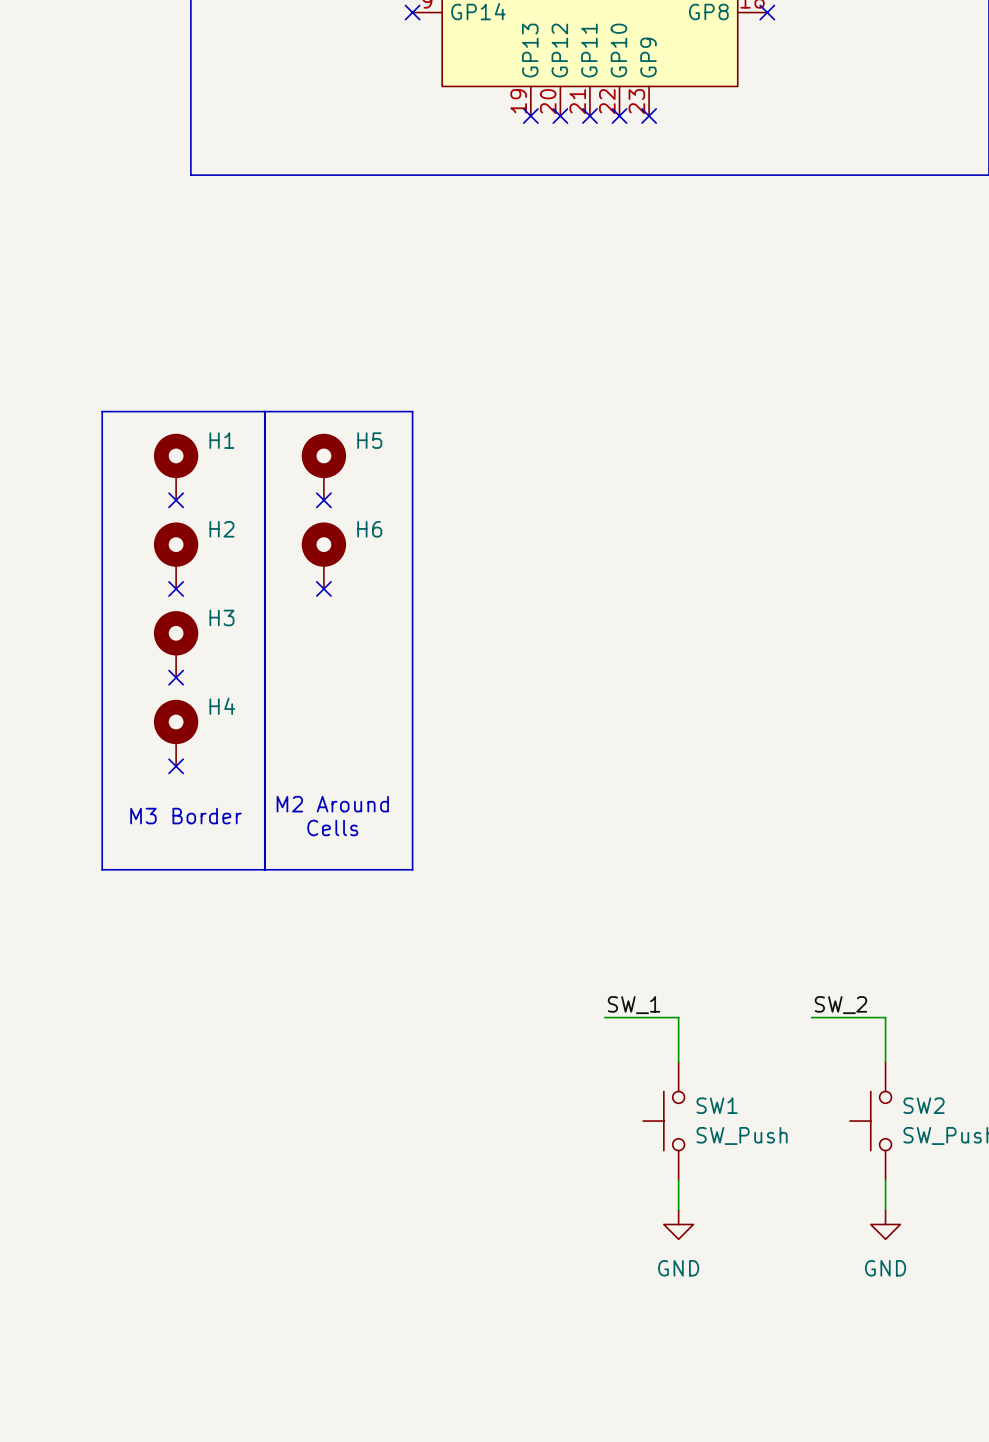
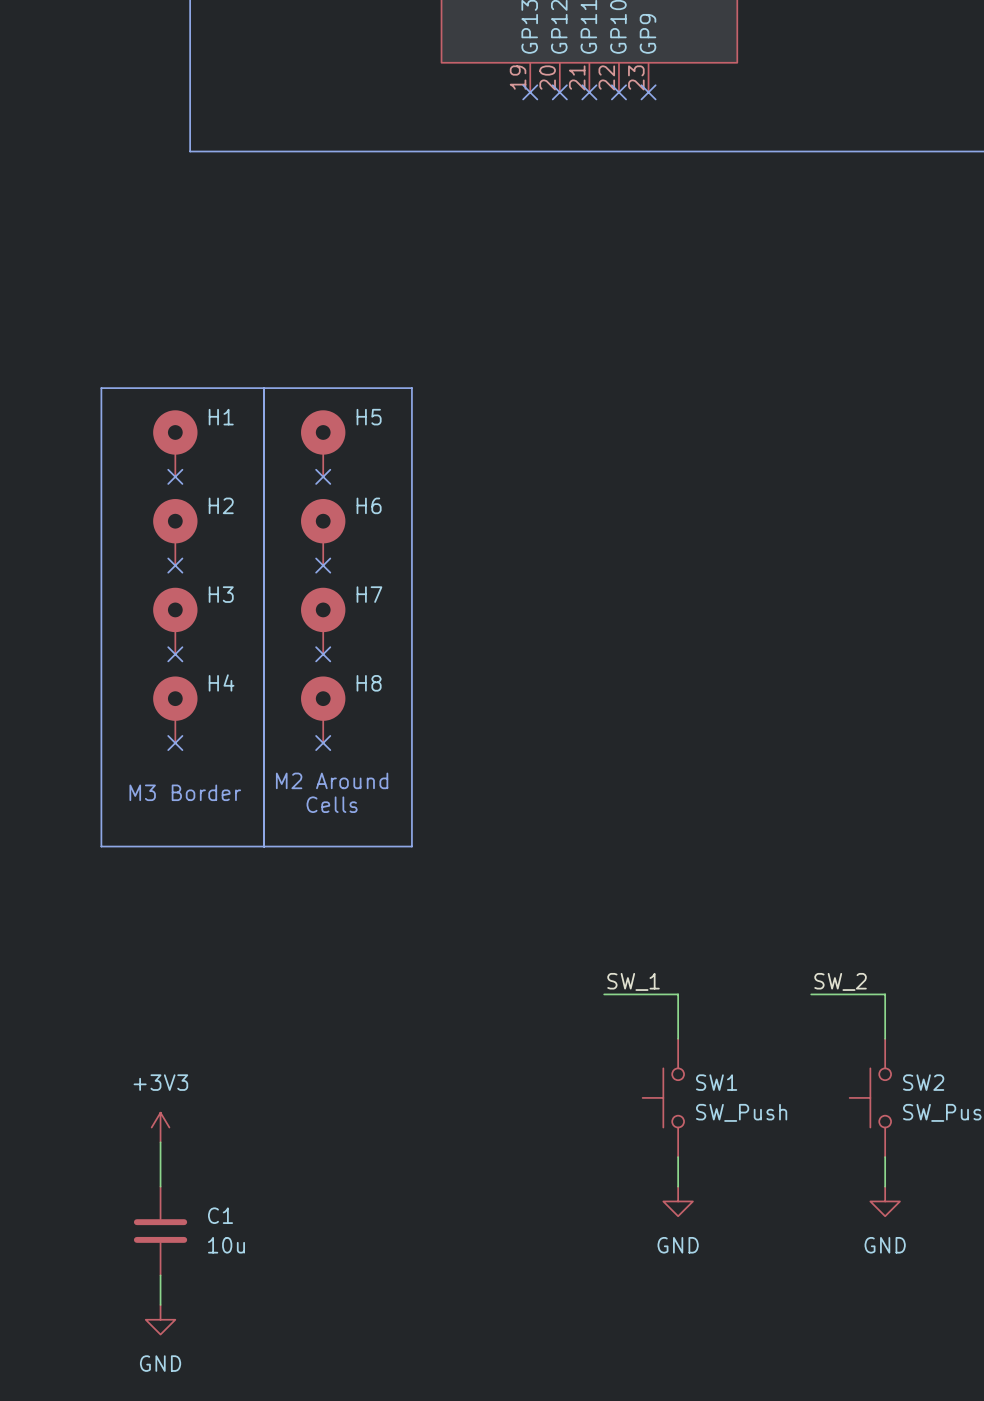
H7: none -> (323, 621)
no-connect mark: none -> (323, 654)
H8: none -> (323, 709)
no-connect mark: none -> (323, 743)
power symbol: none -> +3V3 (160, 1127)
wire: none -> (160, 1142) (160, 1186)
C1: none -> 10u (160, 1231)
wire: none -> (160, 1275) (160, 1304)
power symbol: none -> GND (160, 1319)

